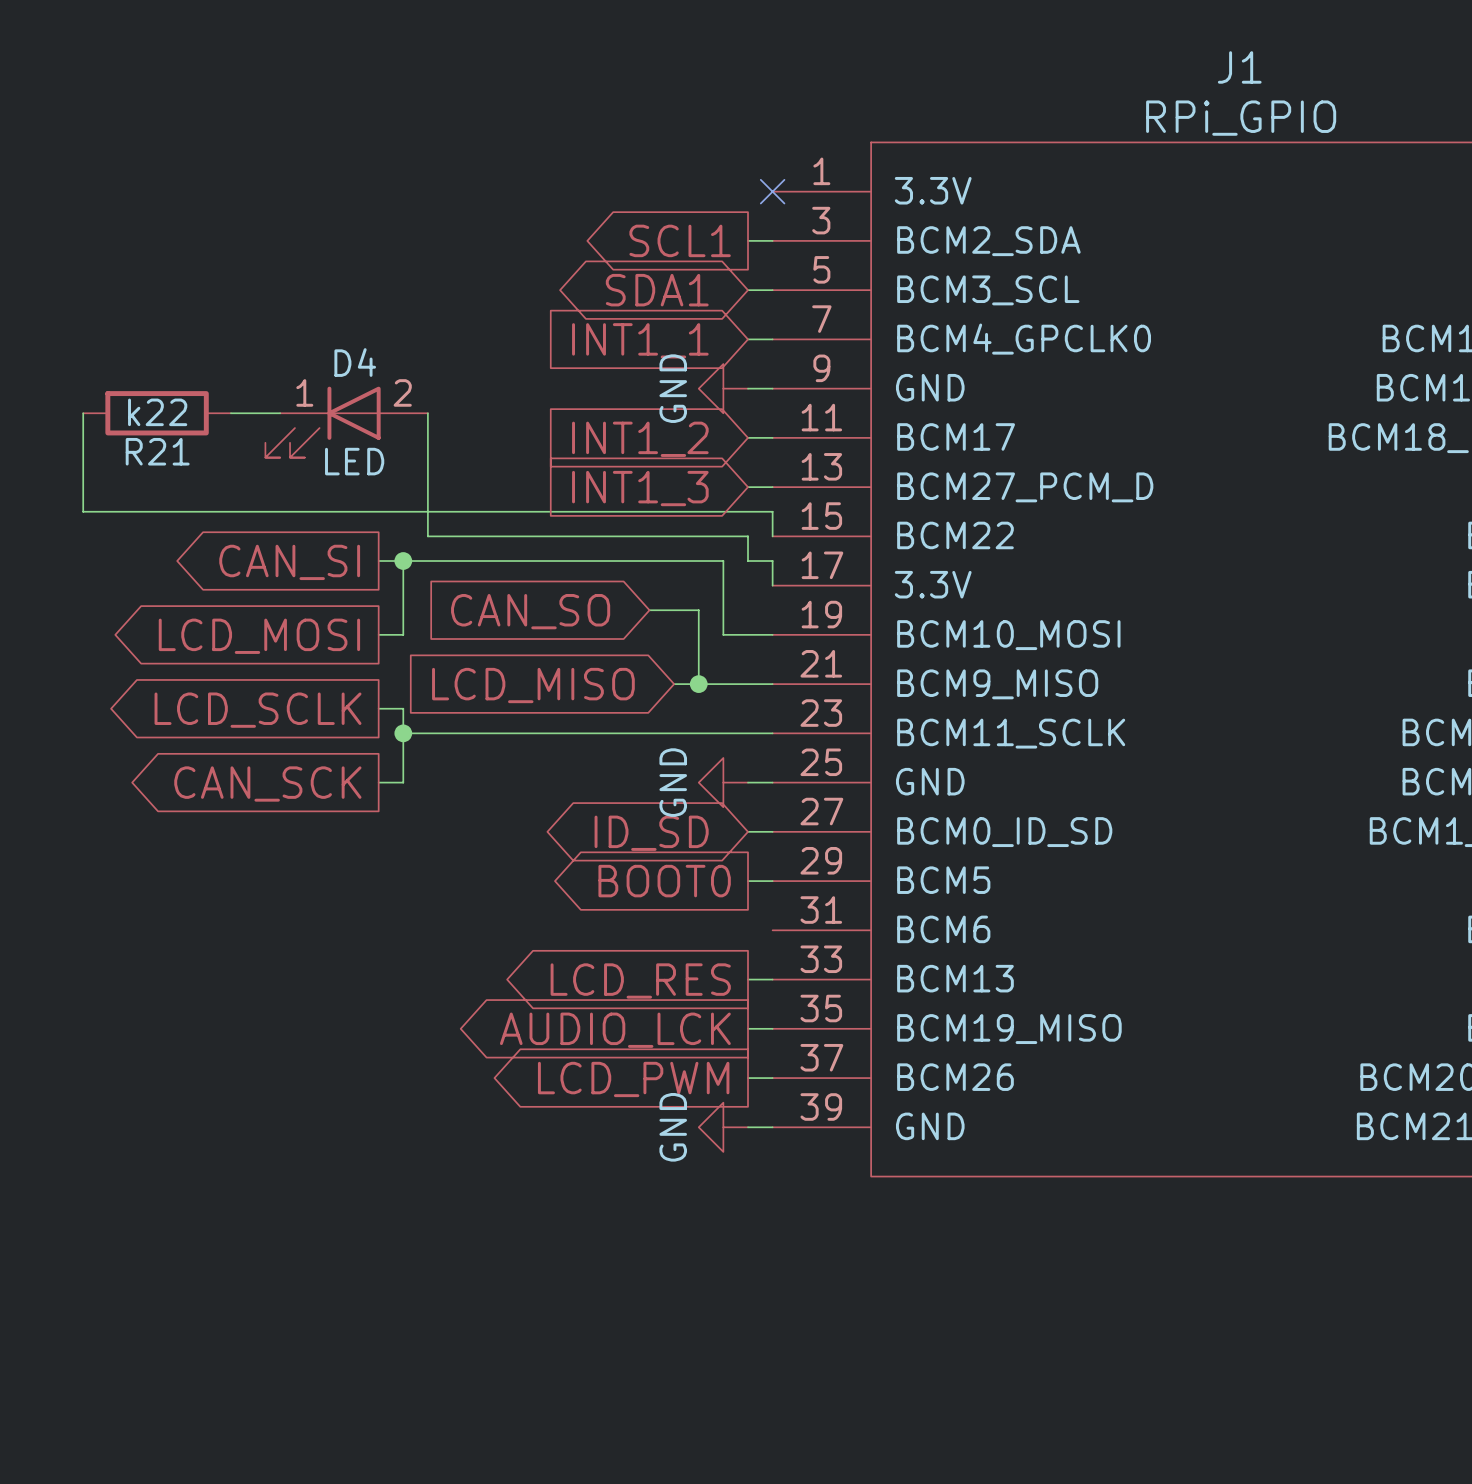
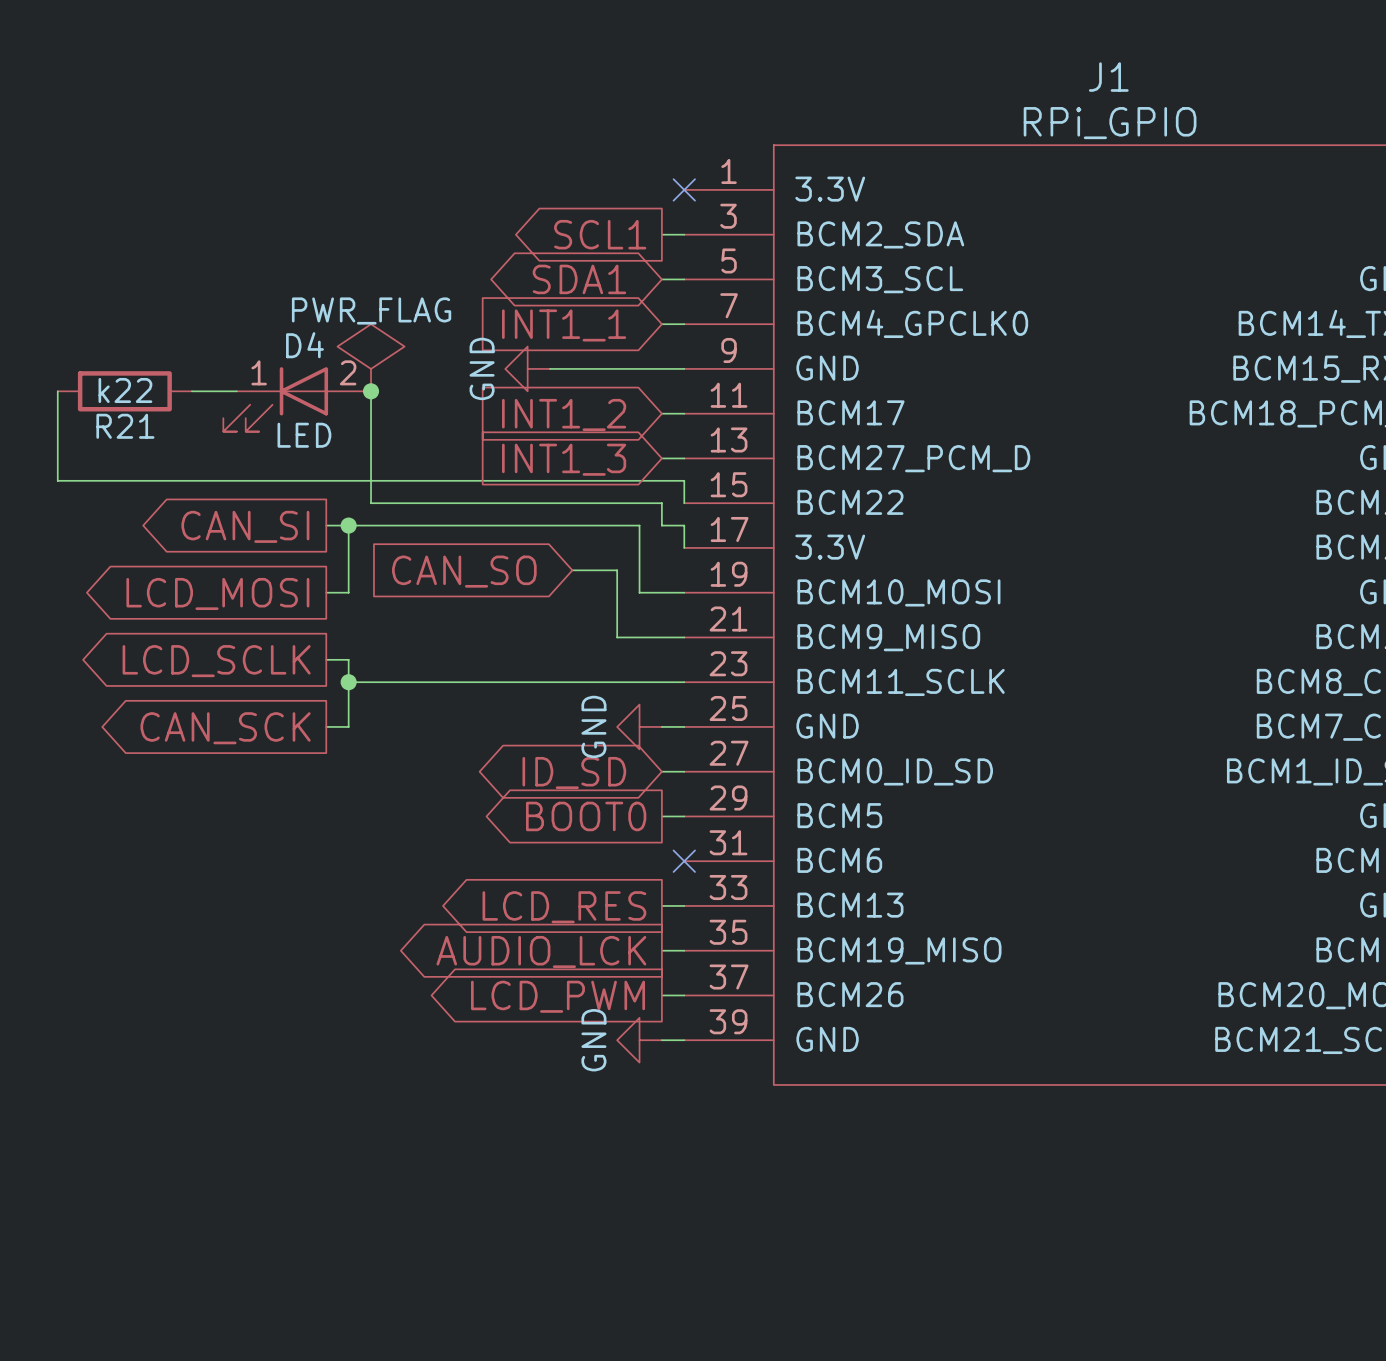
power symbol: none -> PWR_FLAG (371, 357)
wire: none -> (550, 368) (661, 368)
power symbol position: GND (723, 388) -> GND (527, 368)
junction: none -> (371, 391)
wire: (674, 684) (698, 684) -> none
junction: (698, 684) -> none
global label: LCD_MISO (533, 685) -> none
no-connect mark: none -> (684, 861)

